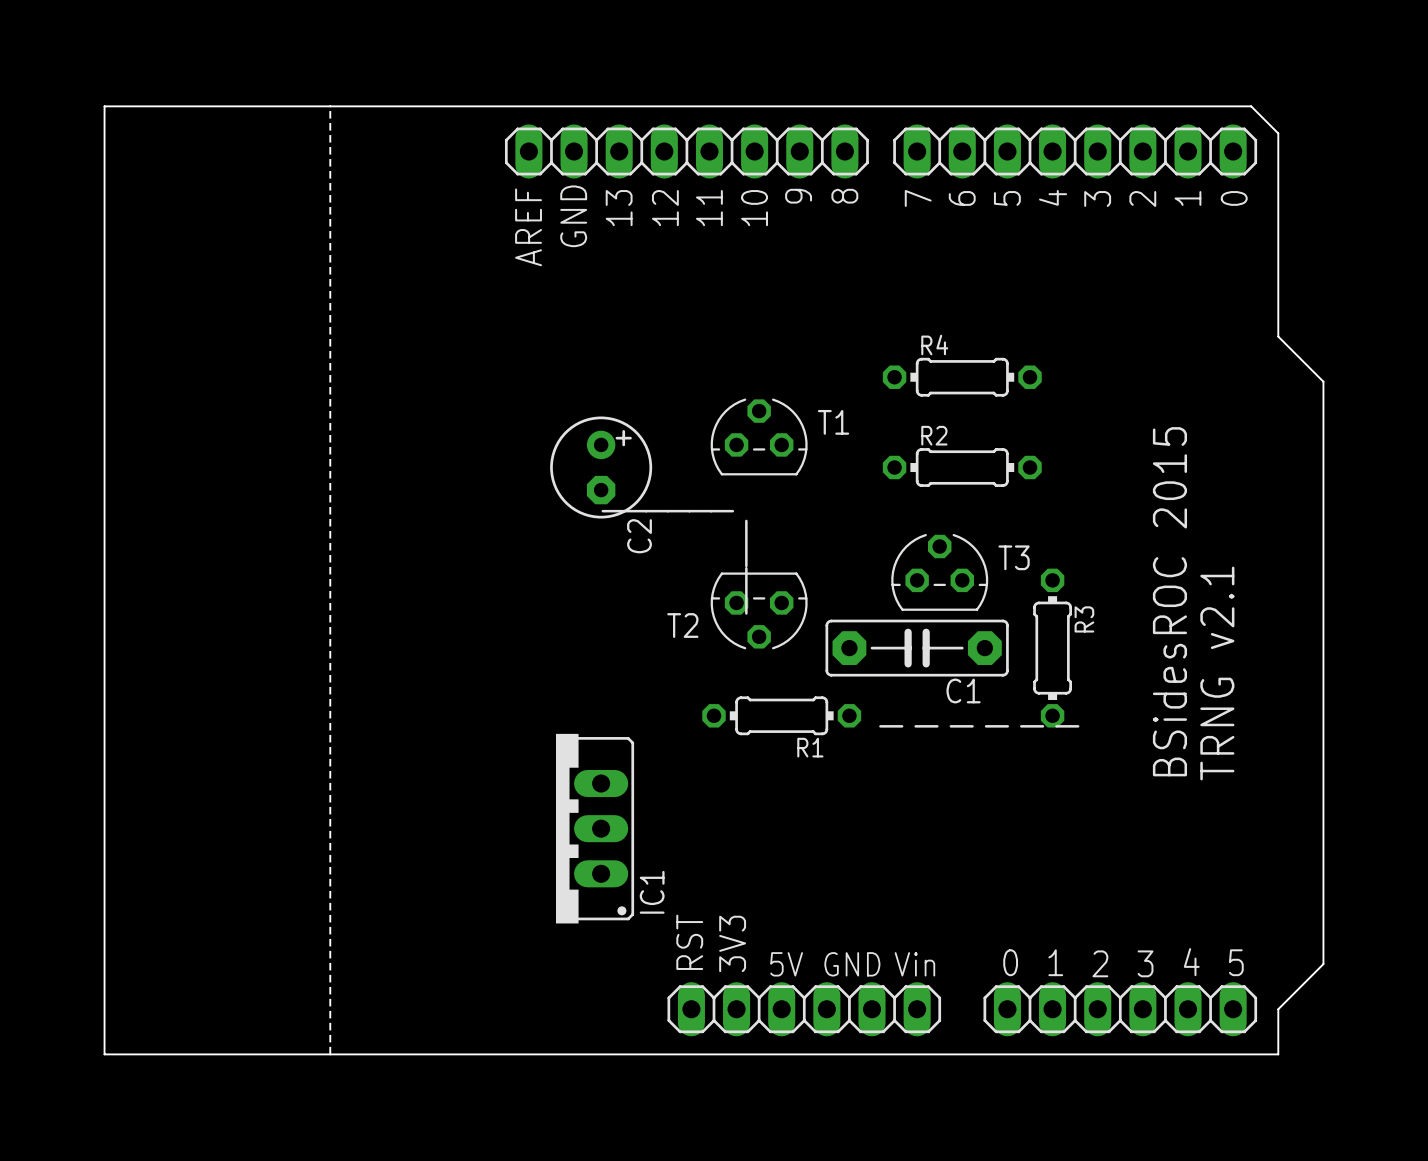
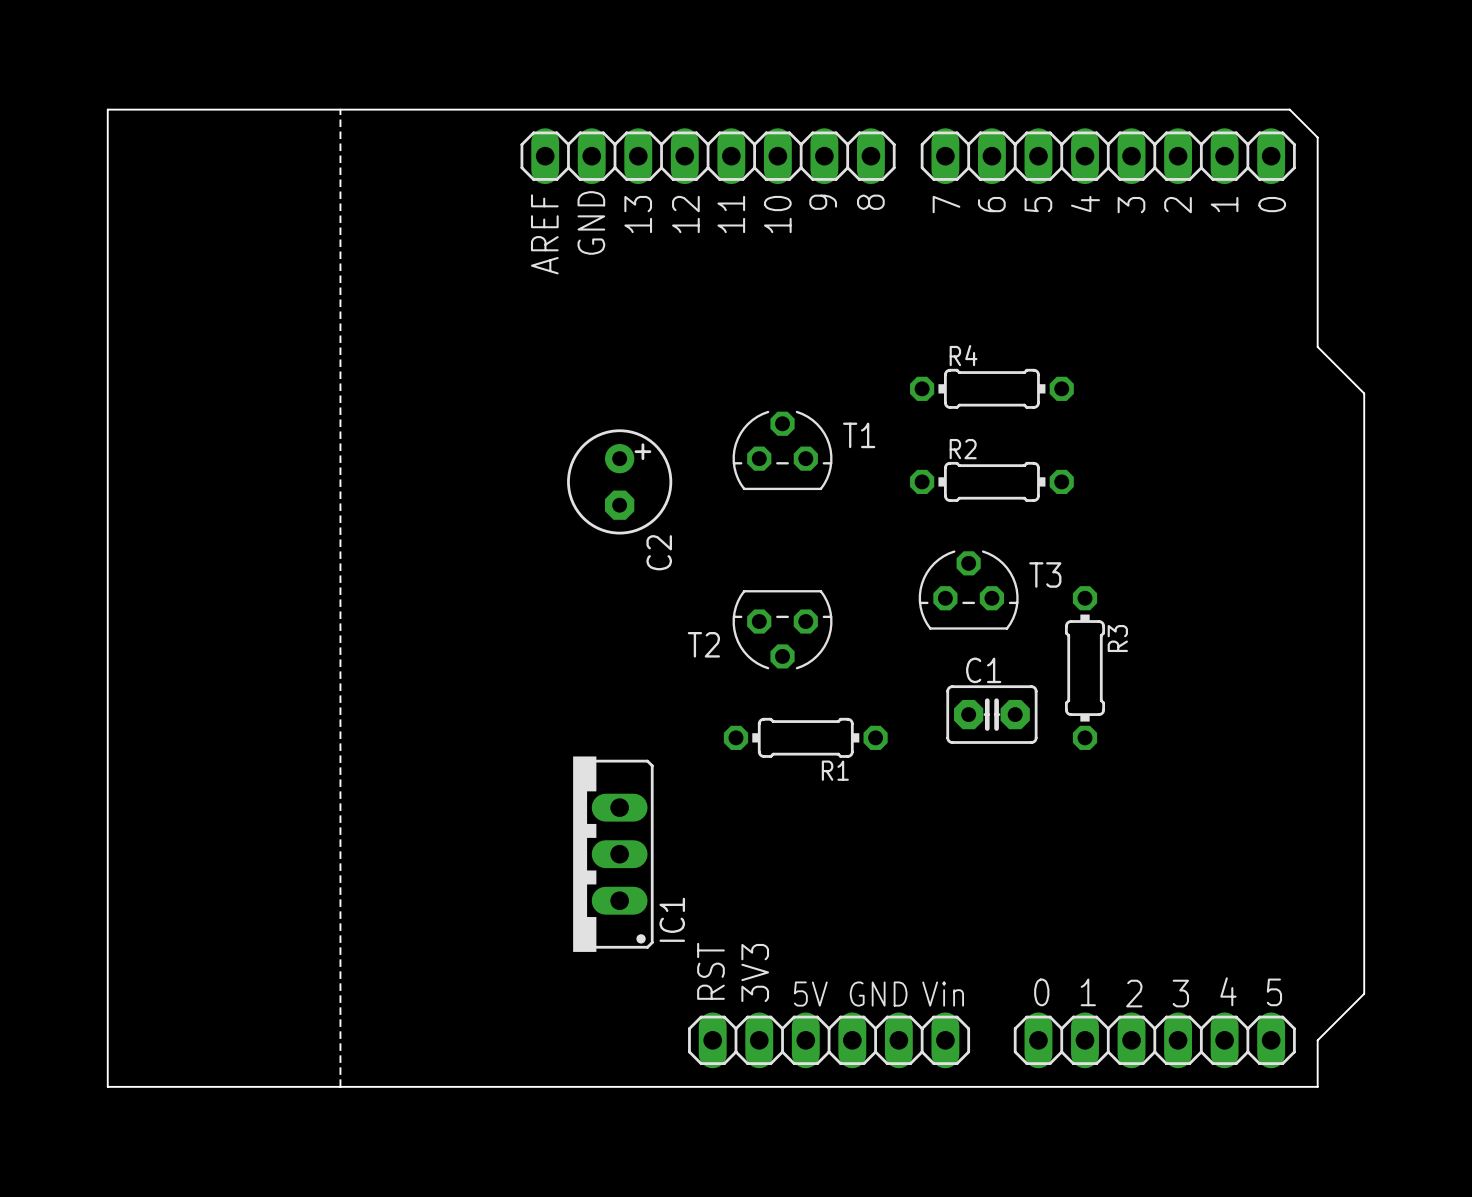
text: ______ (667, 511) -> none
text: | (746, 543) -> none
text: | (746, 590) -> none
text: BSidesROC 2015 (1169, 601) -> none
C1 footprint: [825, 619, 1009, 677] -> [946, 685, 1038, 744]
text: TRNG v2.1 (1217, 673) -> none
C1 name position: C1 (963, 690) -> C1 (983, 670)
text: ------ (979, 726) -> none

